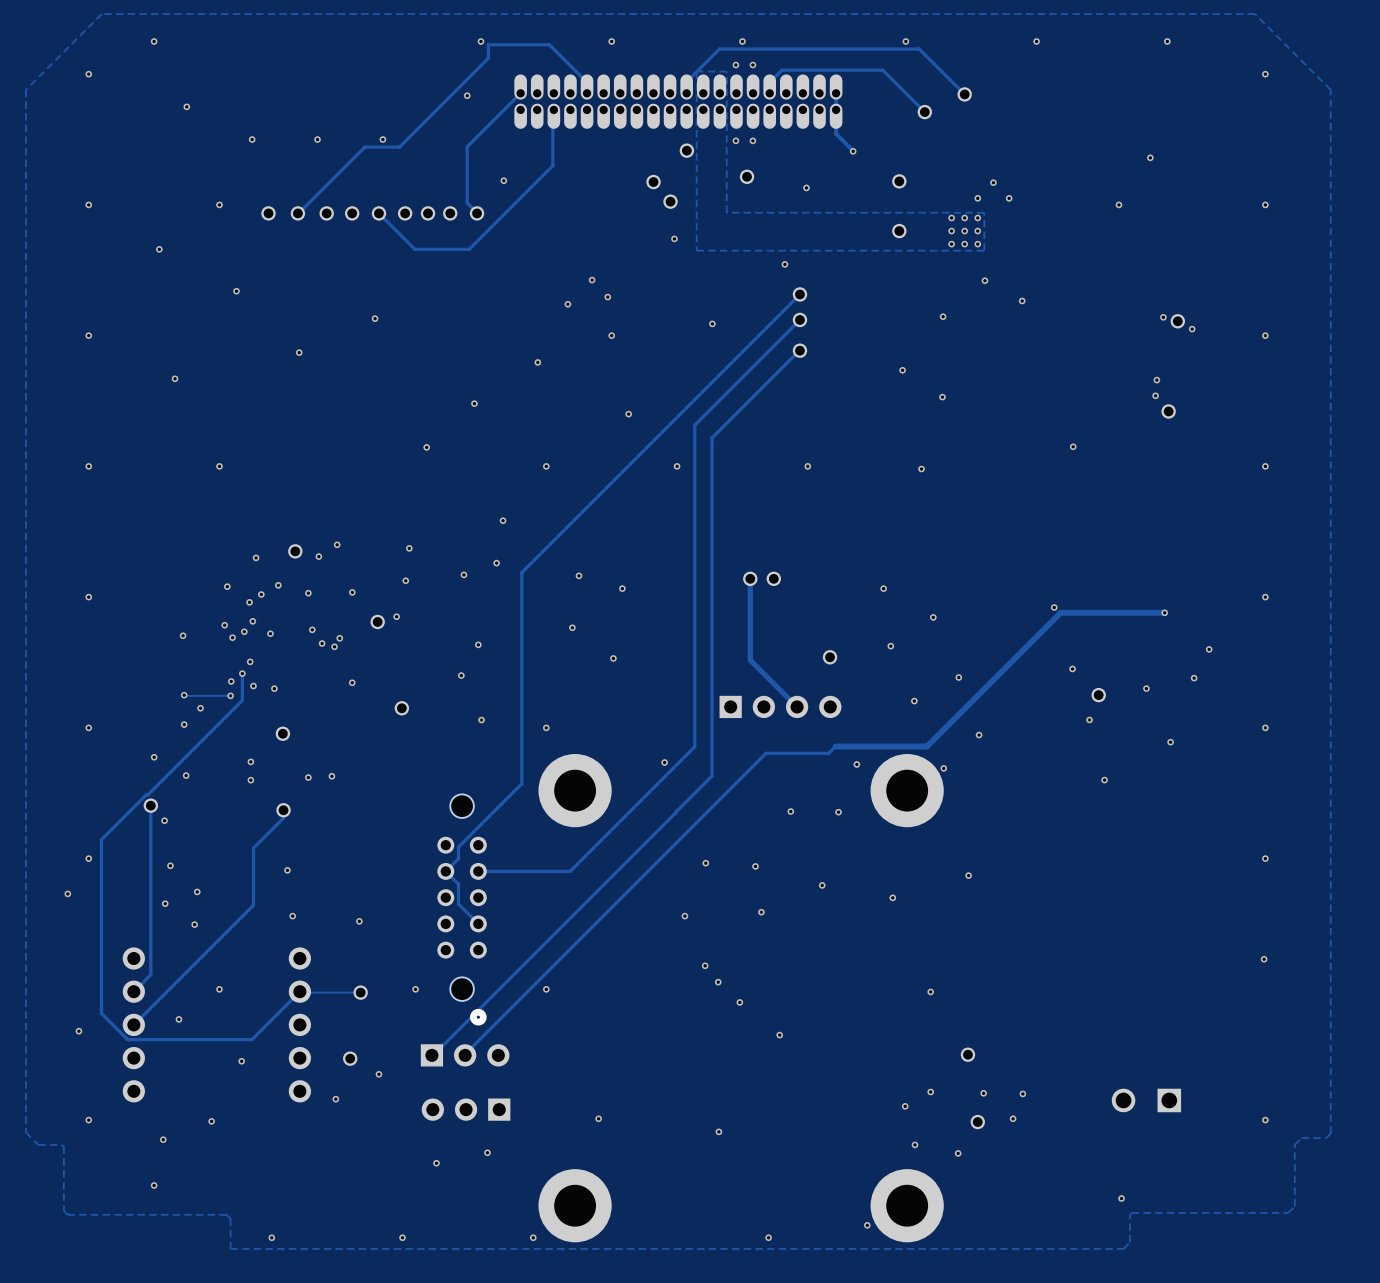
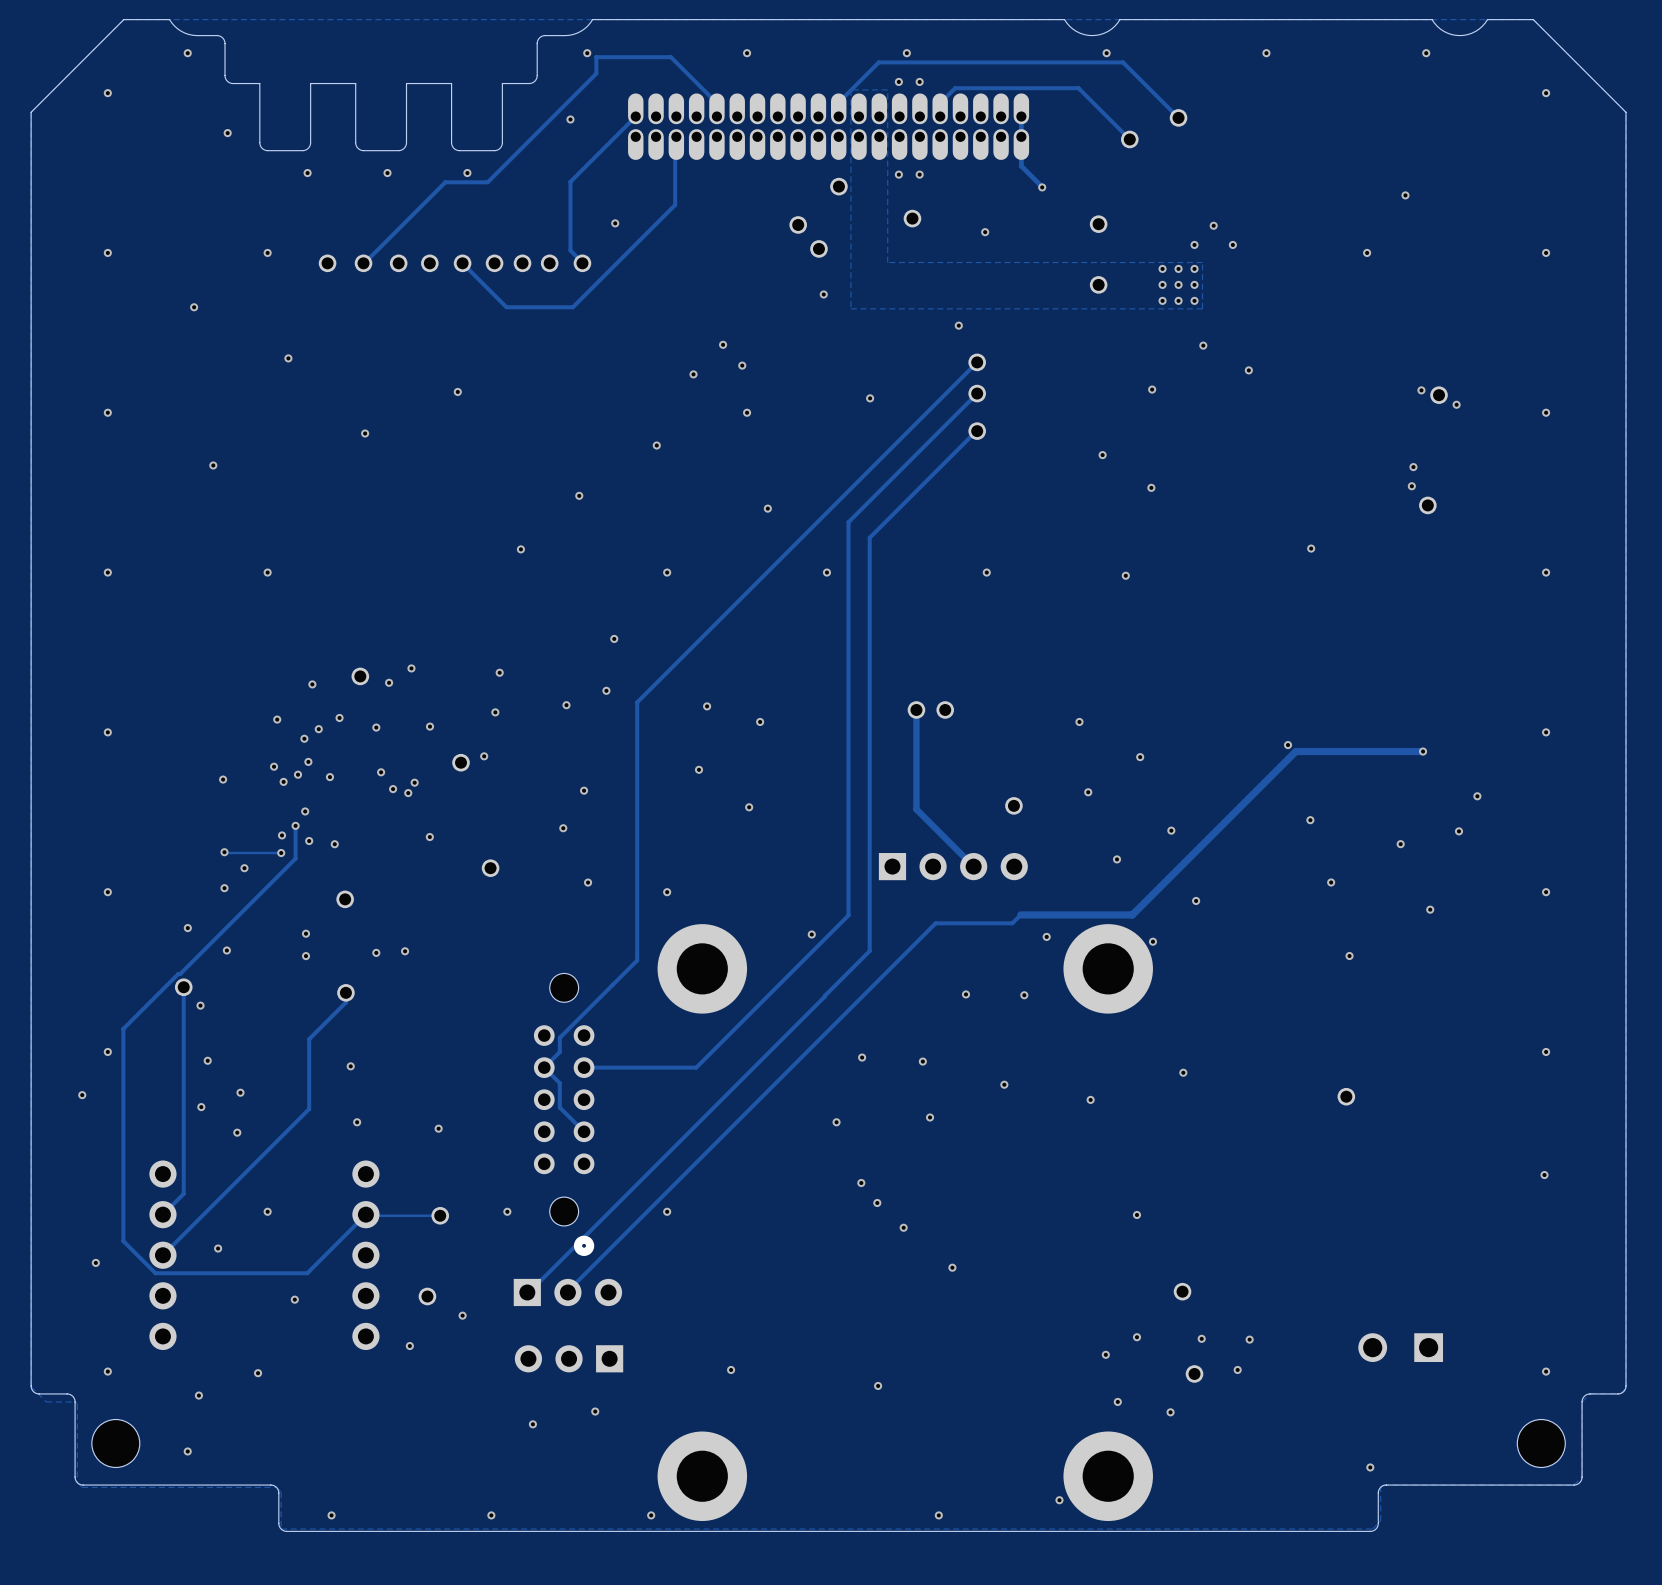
part: none -> (828, 775)
part position: (1098, 695) -> (1346, 1096)

